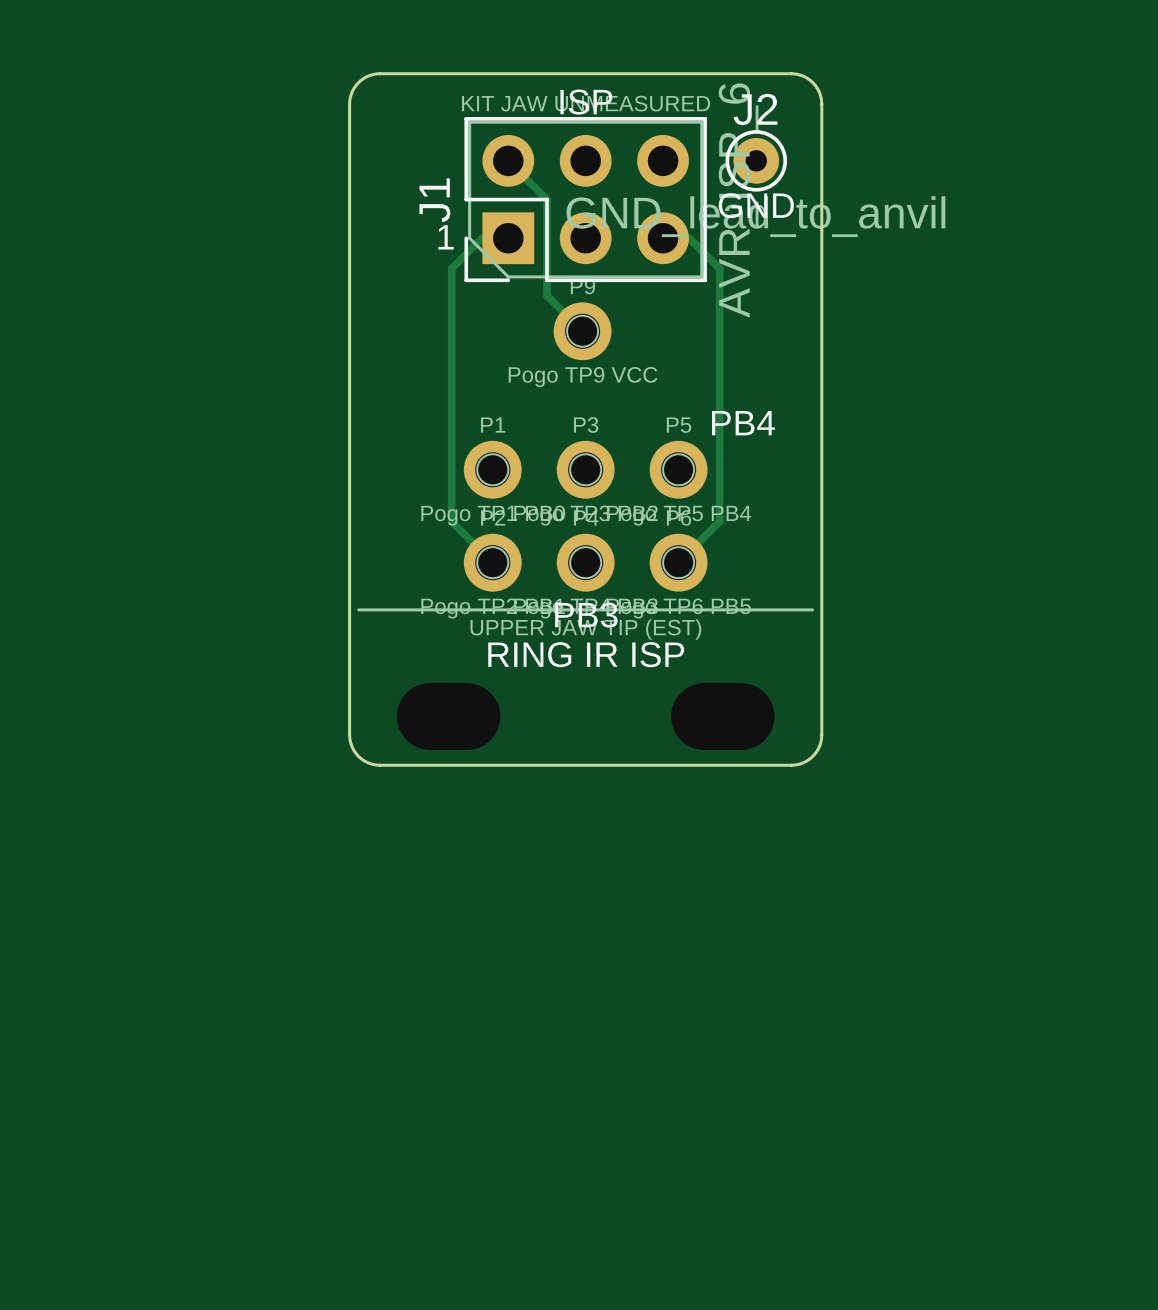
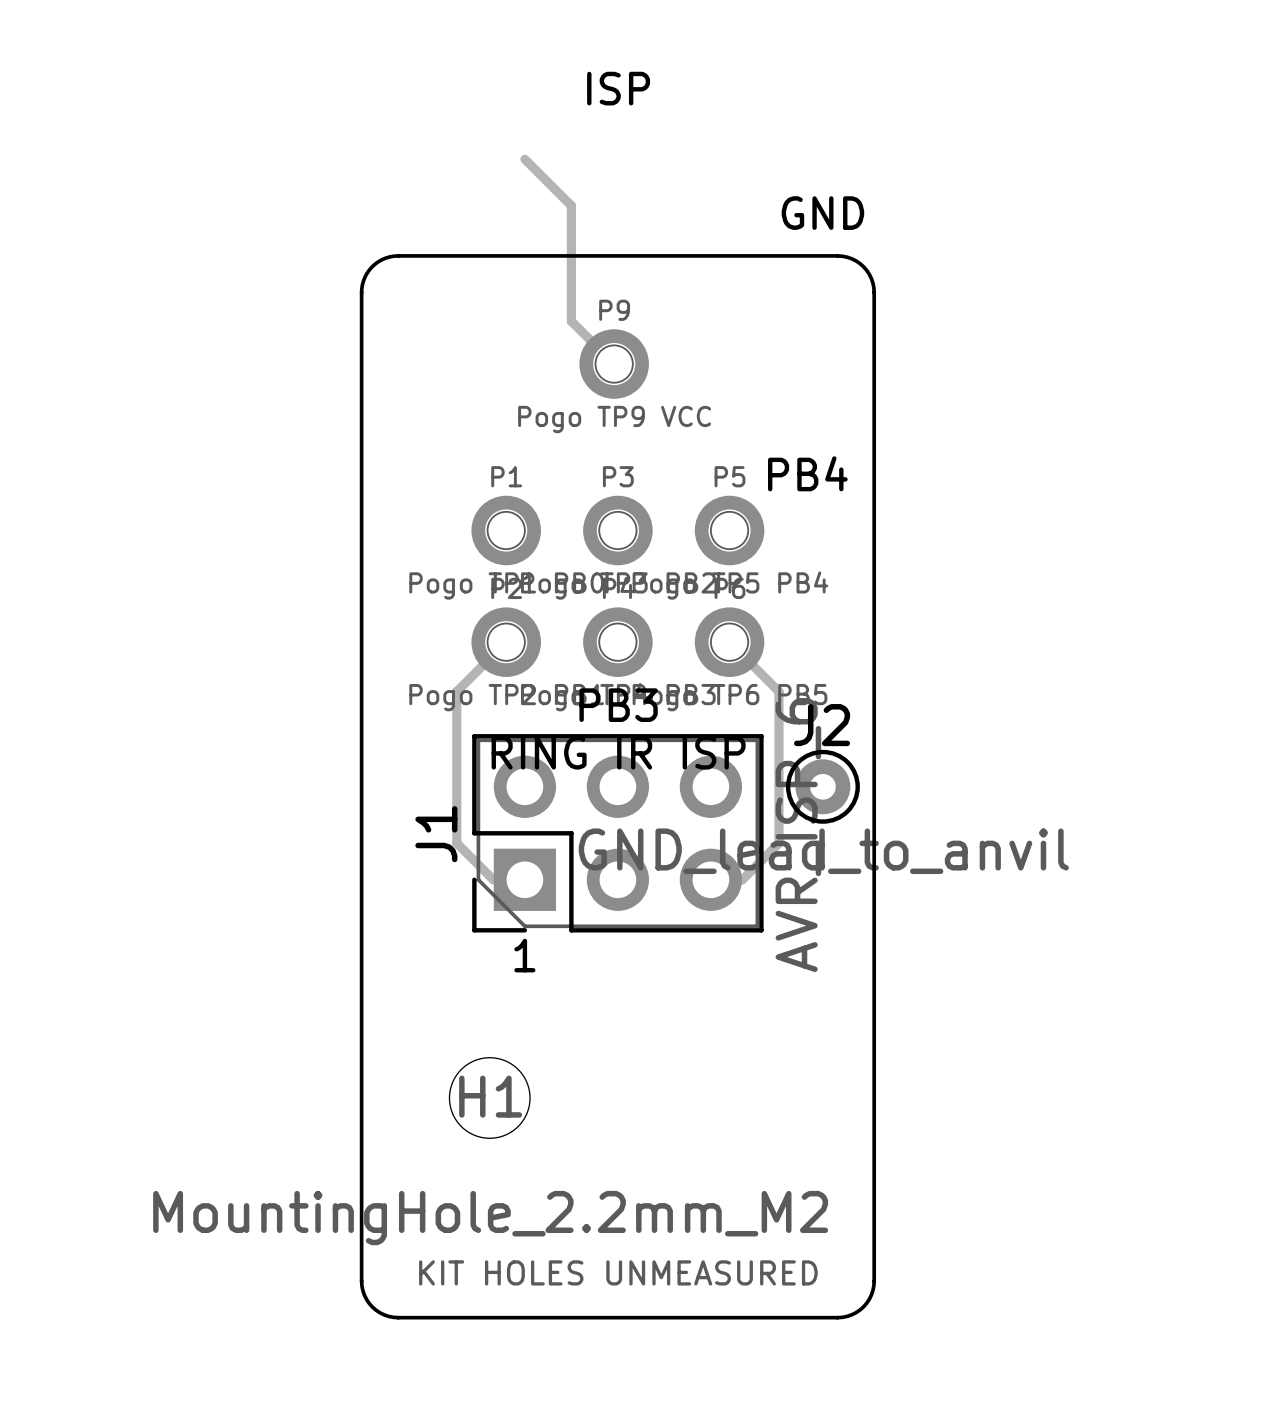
board edge: (380, 73) (791, 73) (806, 77) (817, 88) (821, 104) (821, 734) (817, 750) (806, 761) (791, 765) (380, 765) (364, 761) (353, 750) (349, 734) (349, 104) (352, 90) (358, 82) (366, 76) (380, 73) -> none
text: KIT JAW UNMEASURED (586, 103) -> none
J2 position: (756, 160) -> (822, 786)
J1 position: (585, 199) -> (617, 833)
text position: 1 (446, 237) -> 1 (524, 955)
track: (508, 238) (482, 238) (451, 268) (451, 521) (492, 562) -> (524, 879) (493, 879) (456, 843) (456, 691) (506, 642)
track: (663, 238) (689, 238) (719, 268) (719, 521) (678, 562) -> (710, 879) (742, 879) (778, 843) (778, 691) (729, 642)
board edge: none -> (398, 255) (837, 255) (855, 260) (866, 270) (871, 278) (874, 292) (874, 1281) (869, 1299) (859, 1310) (851, 1314) (837, 1317) (398, 1317) (379, 1312) (369, 1303) (364, 1295) (361, 1281) (361, 292) (363, 280) (372, 266) (386, 257) (398, 255)
line: (358, 609) (812, 609) -> none
text: UPPER JAW TIP (EST) (585, 629) -> none
part: (448, 716) -> none
part: (722, 716) -> none
H1: none -> MountingHole_2.2mm_M2 (489, 1098)
text: none -> KIT HOLES UNMEASURED (618, 1272)

